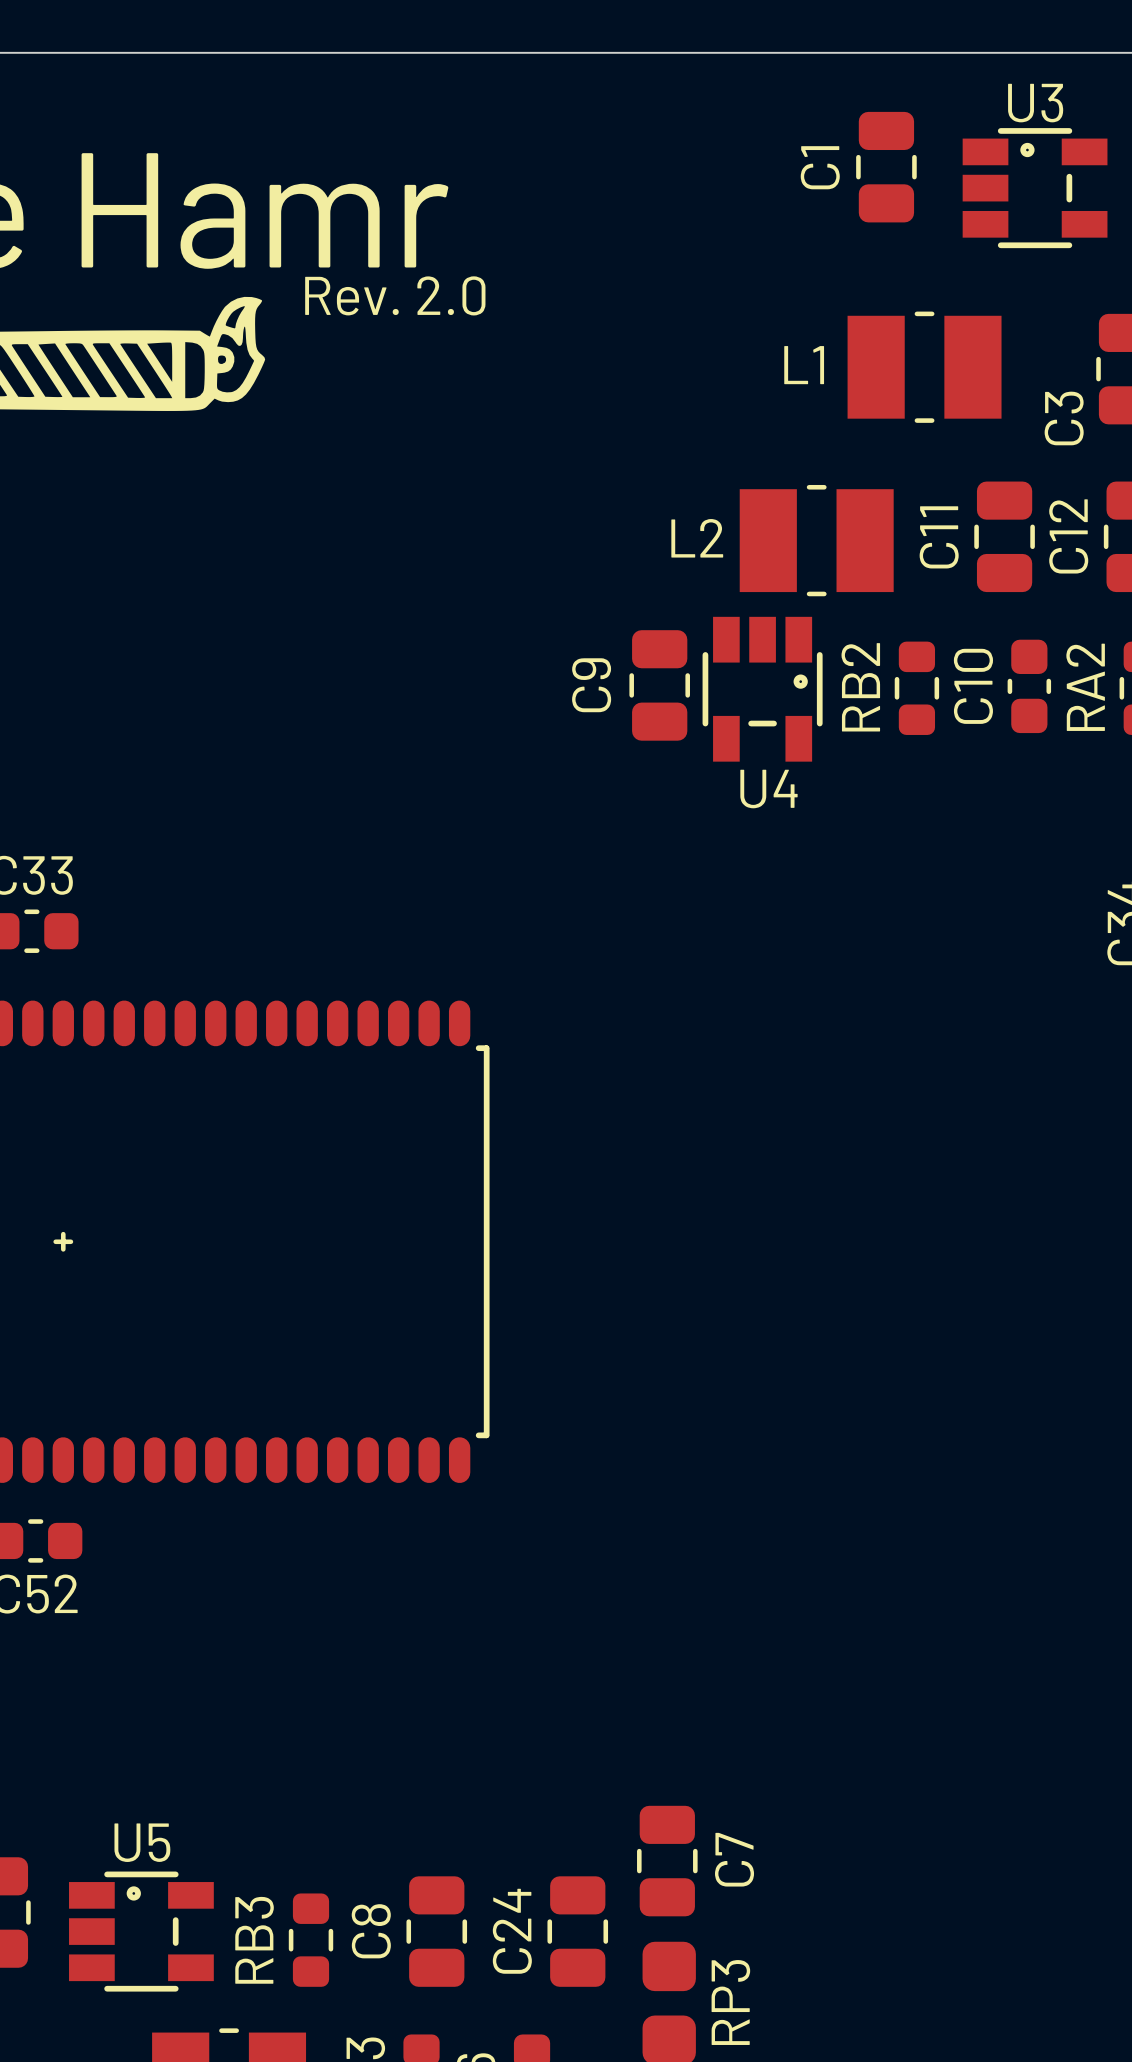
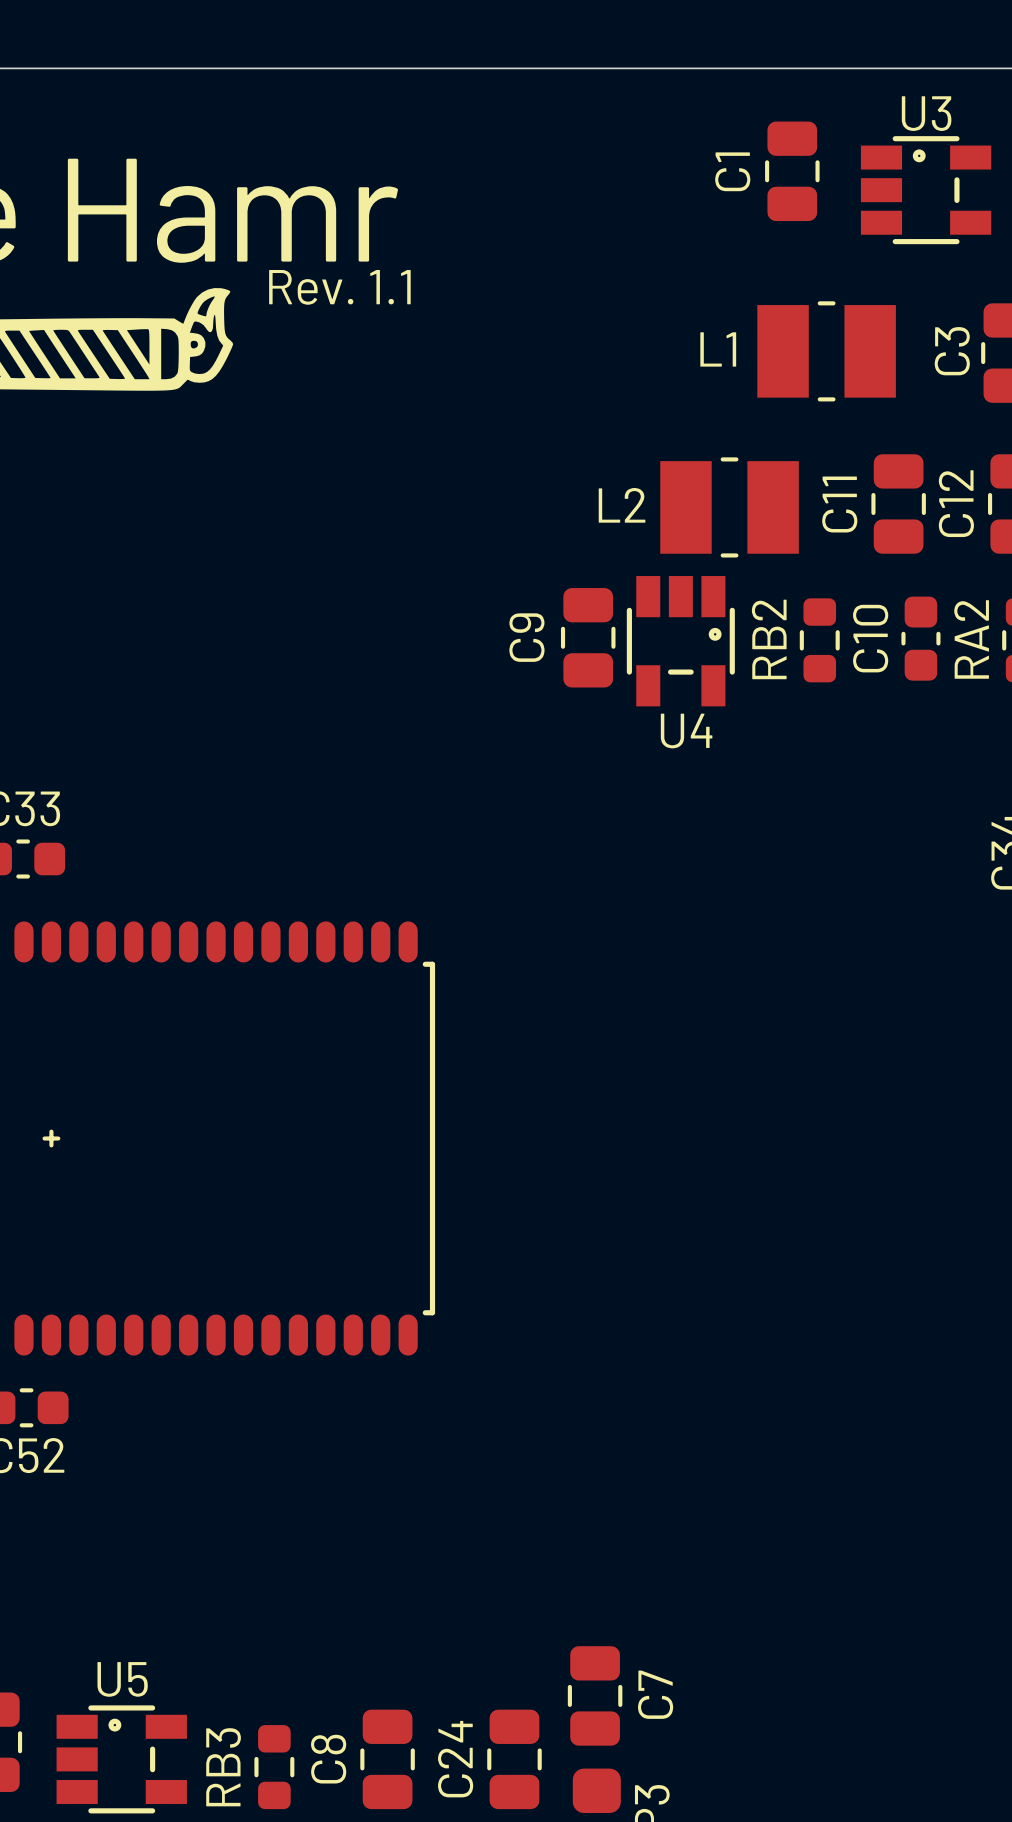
text: Rev. 2.0 (395, 295) -> Rev. 1.1 (339, 287)
C3 name position: C3 (1064, 418) -> C3 (952, 351)

